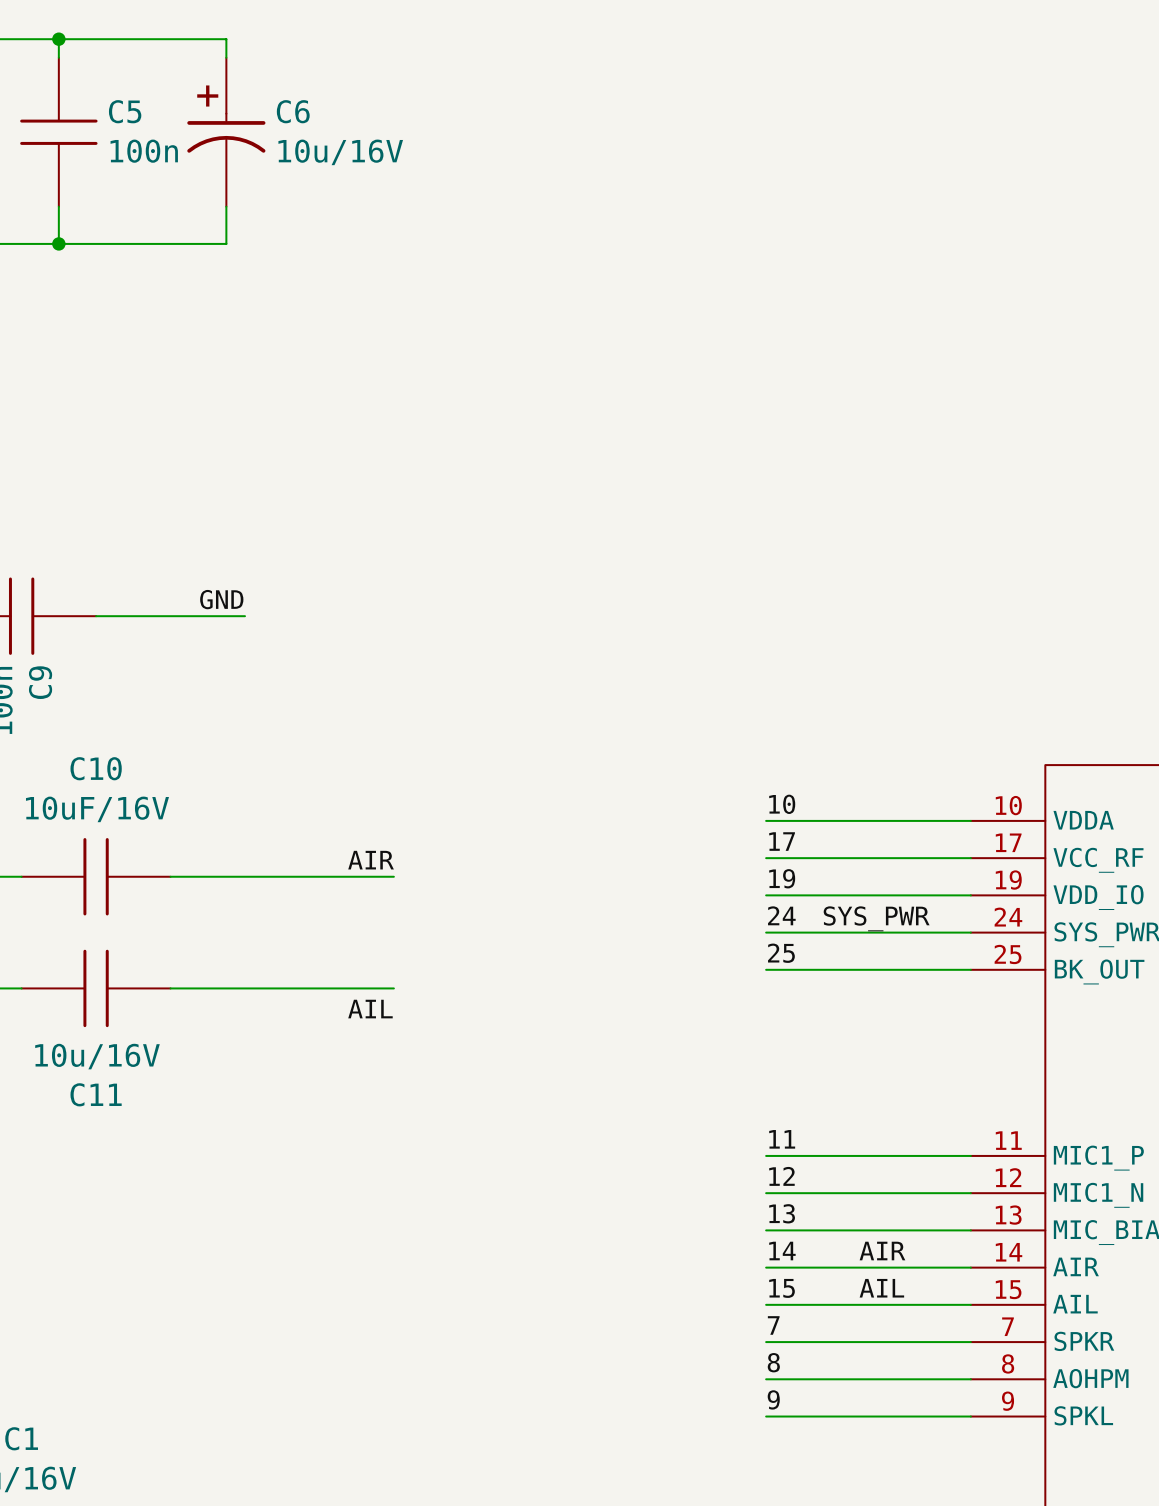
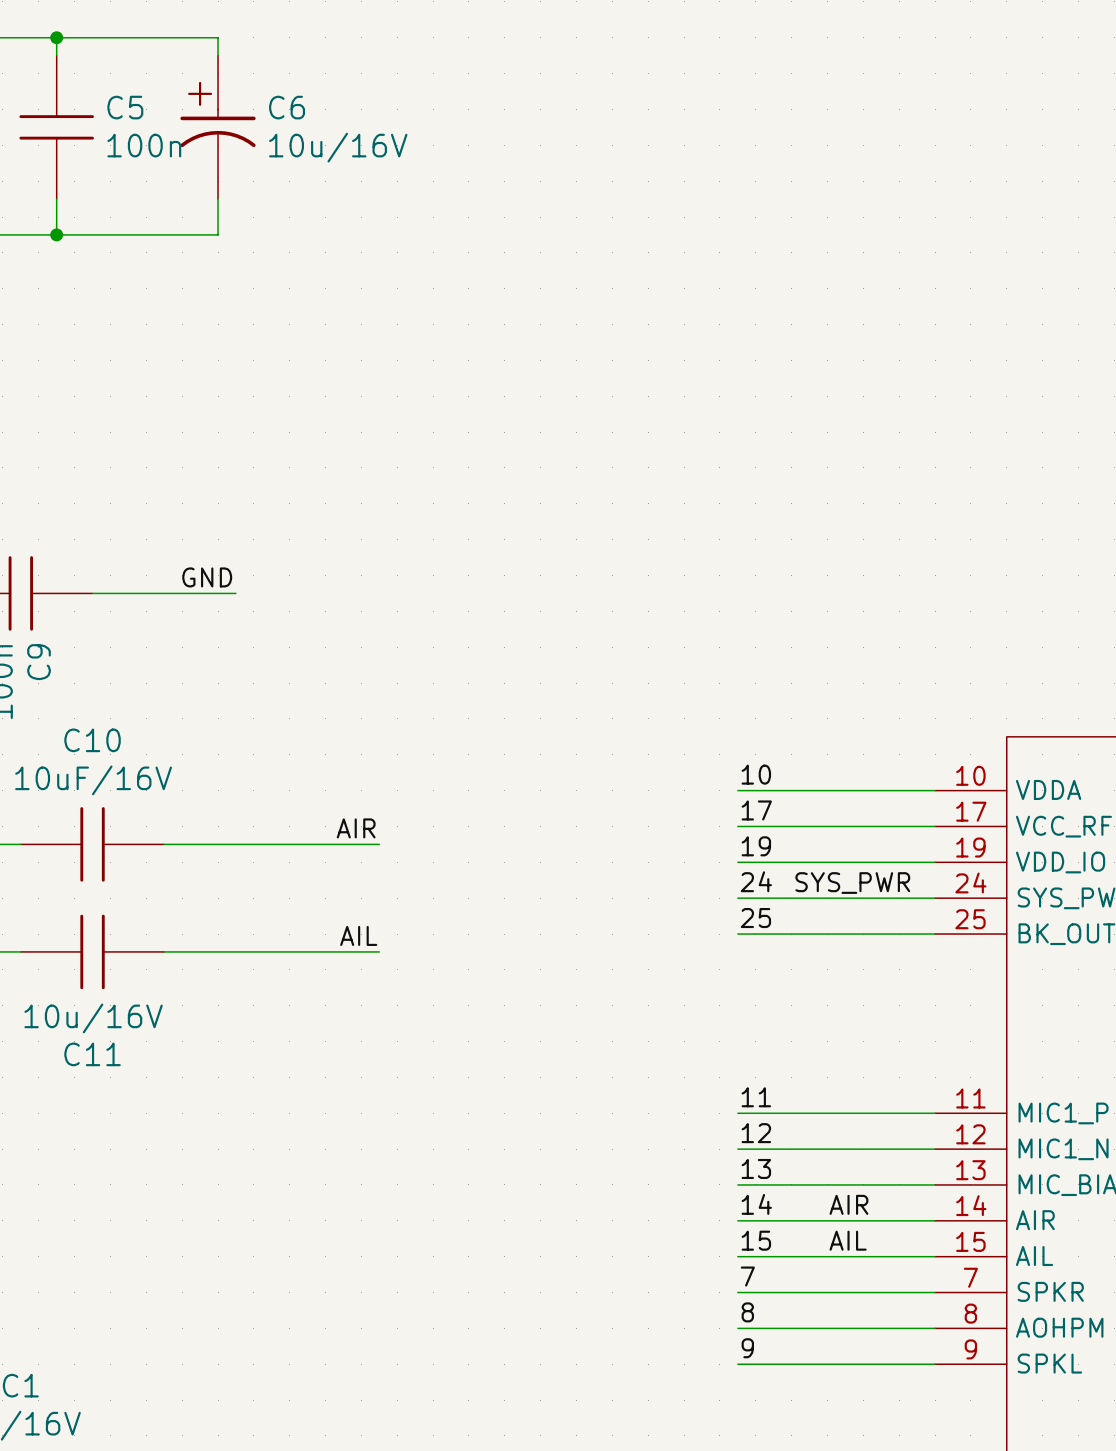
label position: AIL (370, 1009) -> AIL (358, 935)

